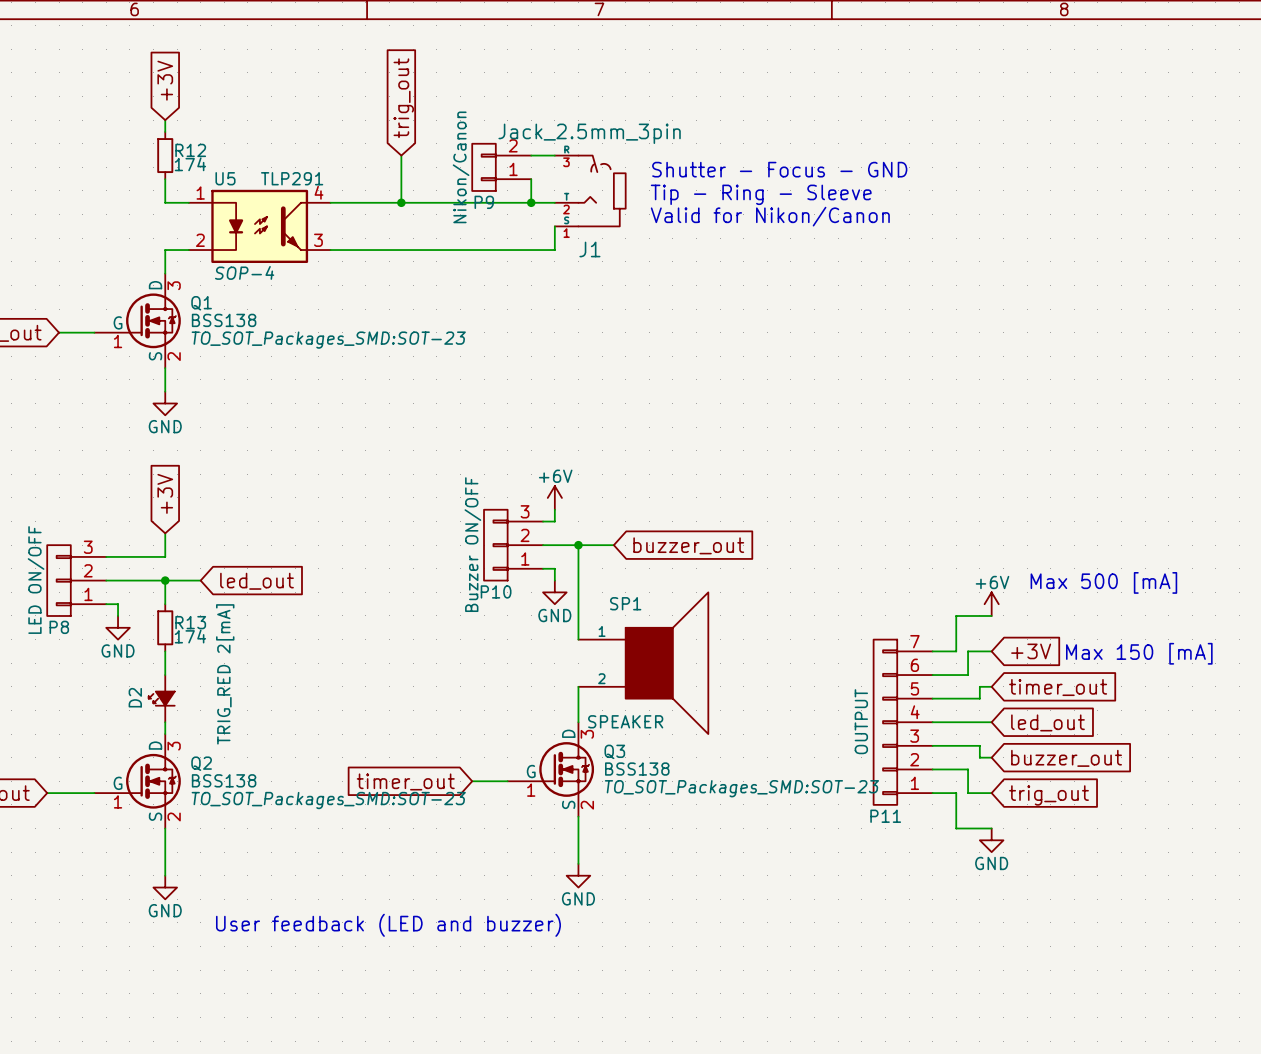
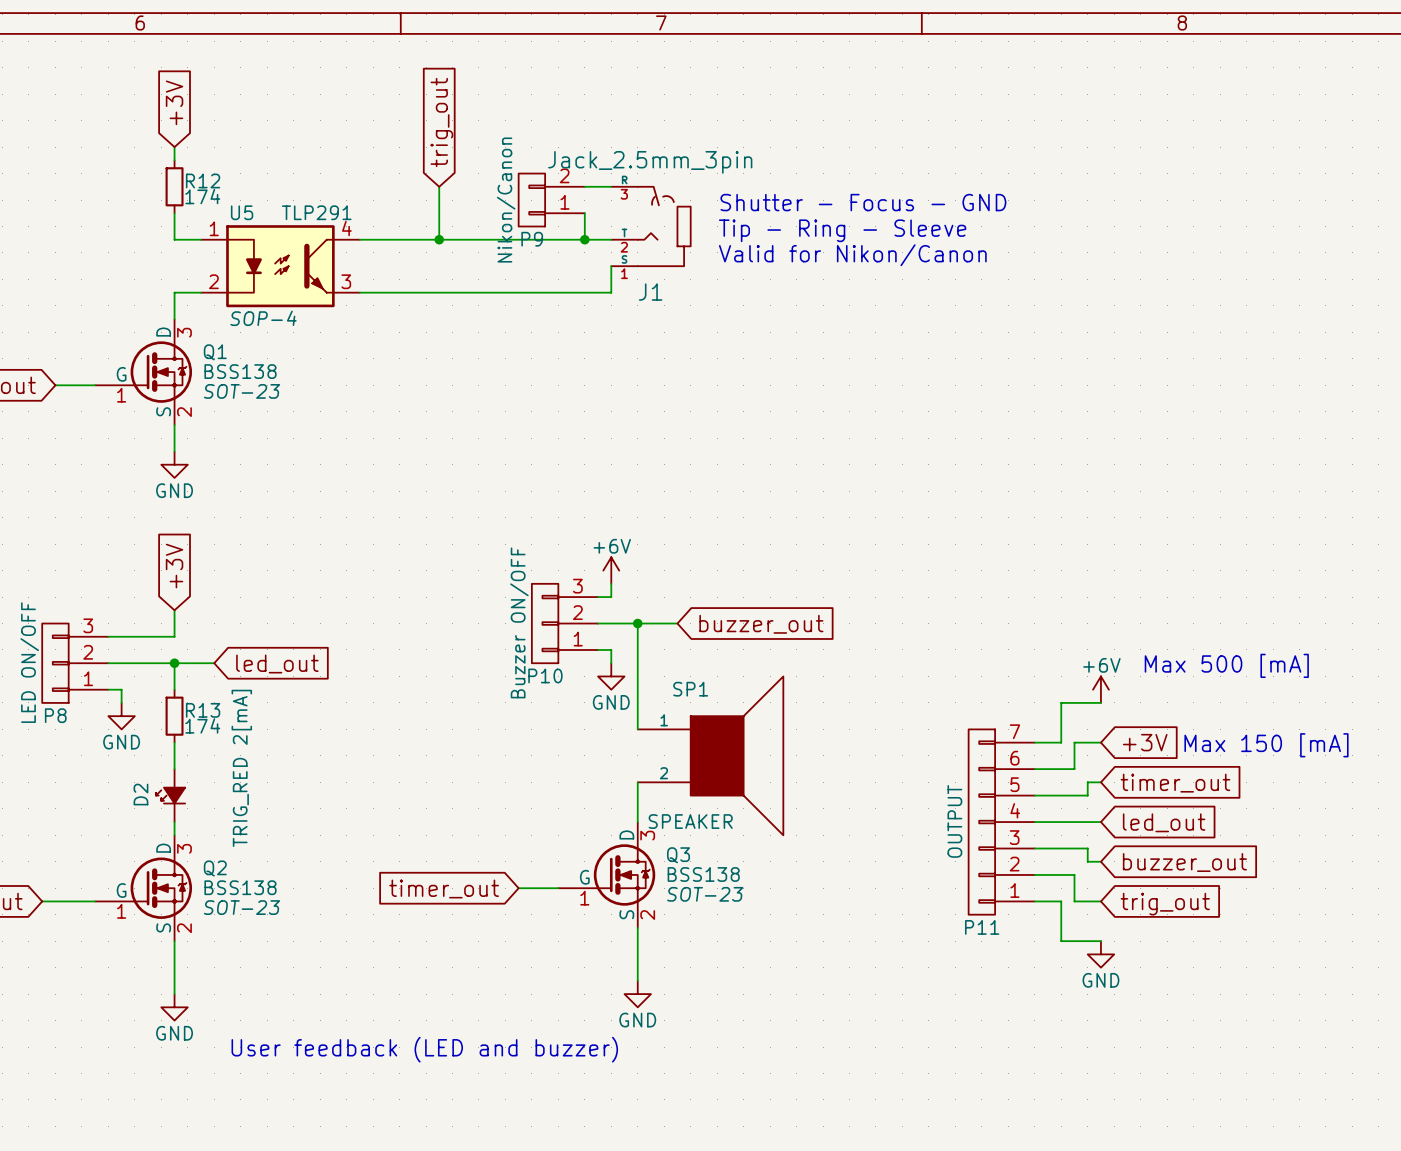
Q1 text: TO_SOT_Packages_SMD:SOT-23 (328, 340) -> SOT-23 (242, 391)
Q3 text: TO_SOT_Packages_SMD:SOT-23 (741, 788) -> SOT-23 (705, 894)
Q2 text: TO_SOT_Packages_SMD:SOT-23 (328, 800) -> SOT-23 (242, 907)

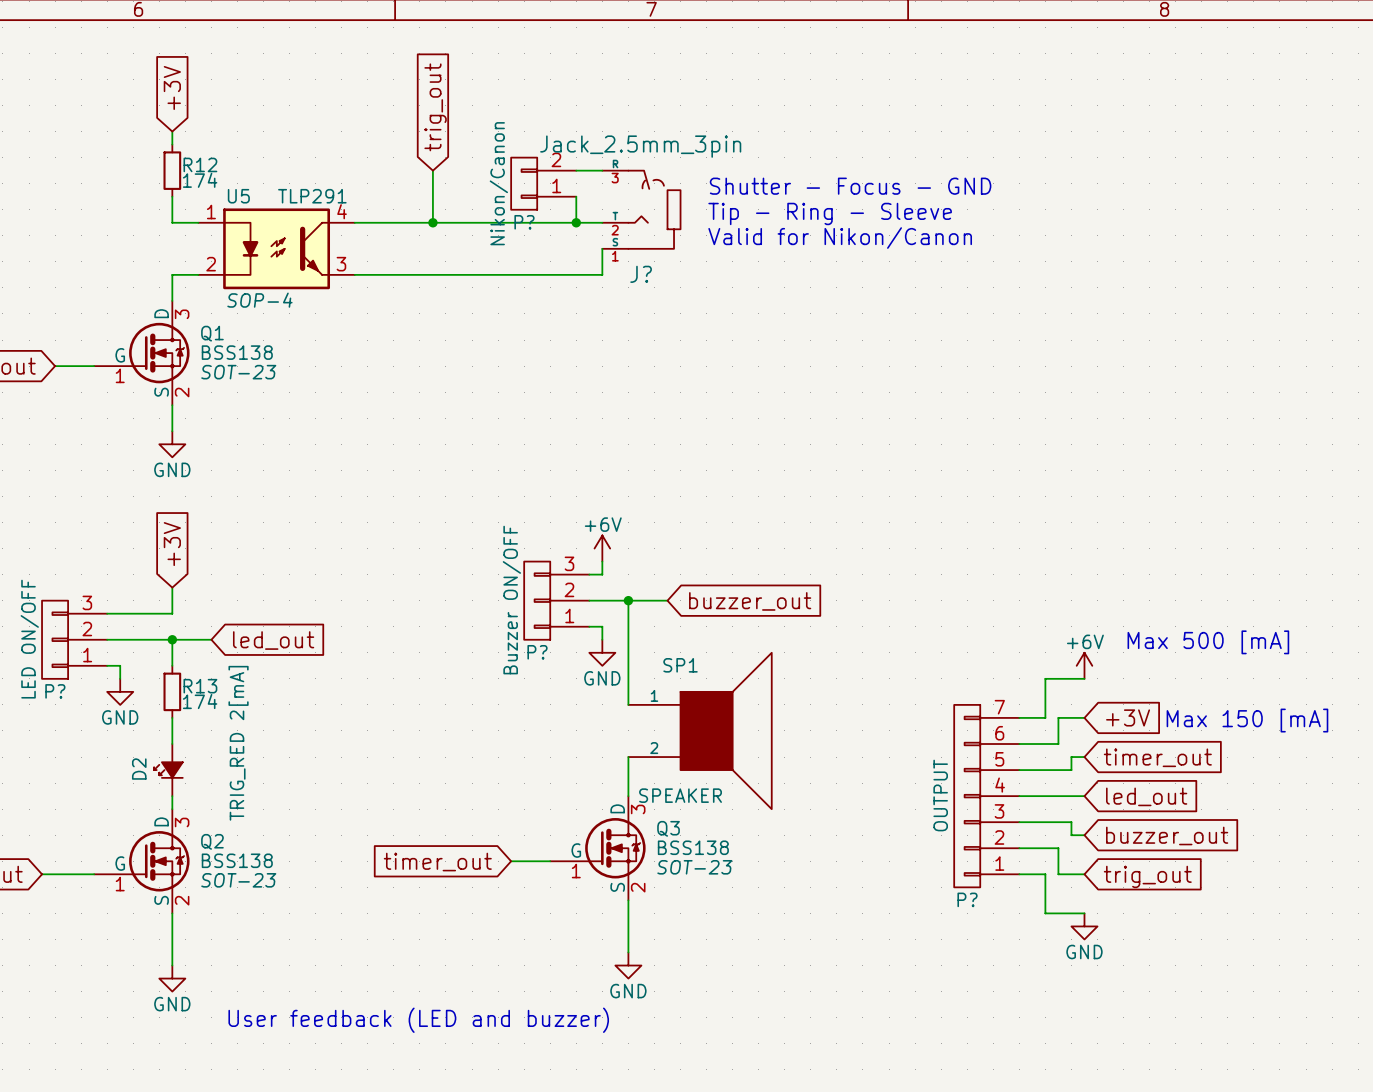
P9 name: P9 (532, 239) -> P? (524, 222)
J1 name: J1 (650, 292) -> J? (641, 274)
P10 name: P10 (545, 675) -> P? (537, 652)
P8 name: P8 (55, 715) -> P? (55, 691)
P11 name: P11 (982, 927) -> P? (967, 899)

